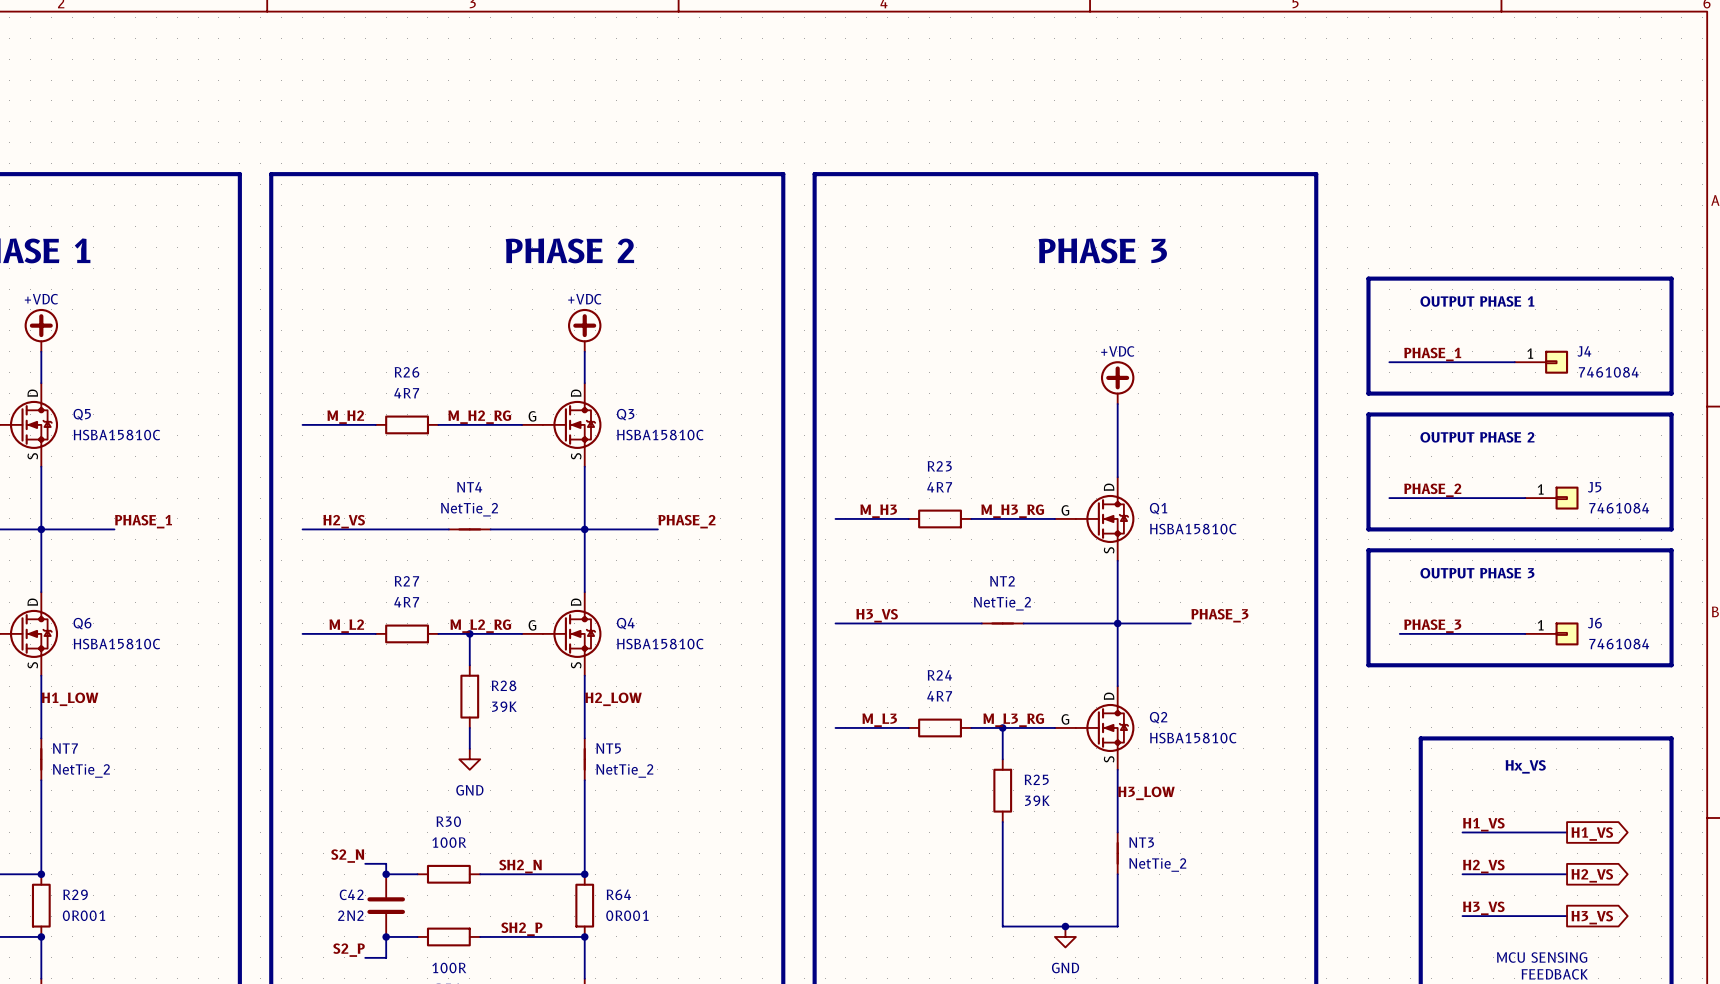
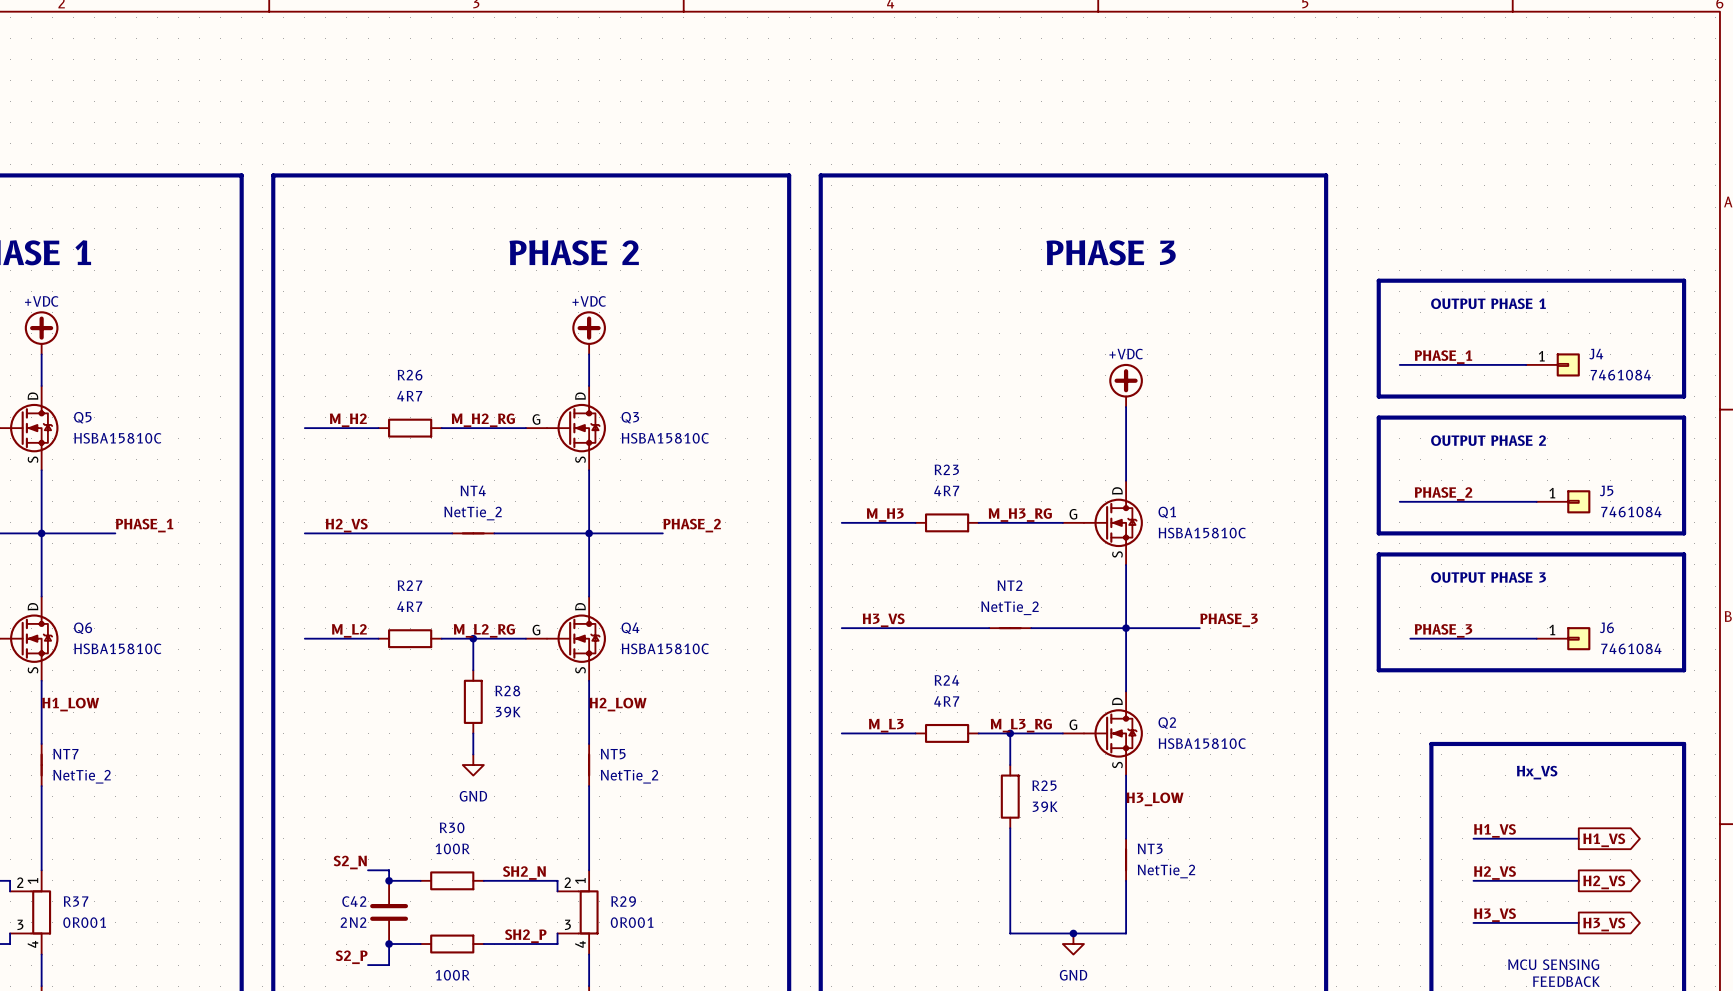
wire: (41, 863) (41, 874) (9, 874) -> (10, 891) (10, 880)
wire: (584, 863) (584, 874) (553, 874) -> (557, 891) (557, 880)
R29 symbol: [31, 874, 51, 937] -> [557, 870, 599, 955]
junction: (41, 874) -> none
junction: (584, 874) -> none
R37: none -> 0R001 (30, 912)
R64: 0R001 (584, 905) -> none
wire: (9, 936) (41, 936) (41, 947) -> (10, 944) (10, 933)
junction: (41, 936) -> none
wire: (553, 936) (584, 936) (584, 947) -> (557, 944) (557, 933)
junction: (584, 936) -> none

